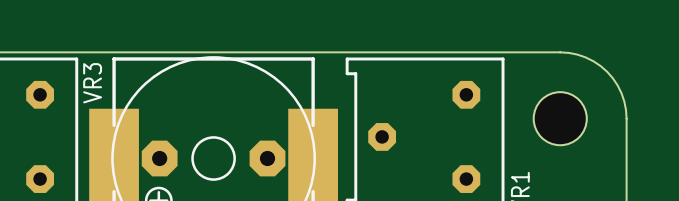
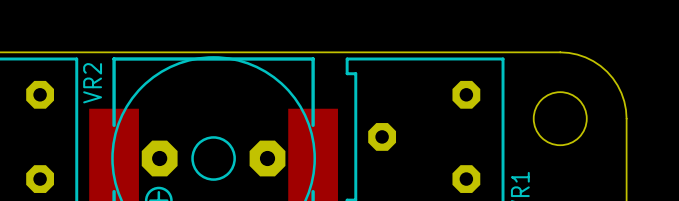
VR3 name: VR3 (92, 83) -> VR2 (92, 83)

